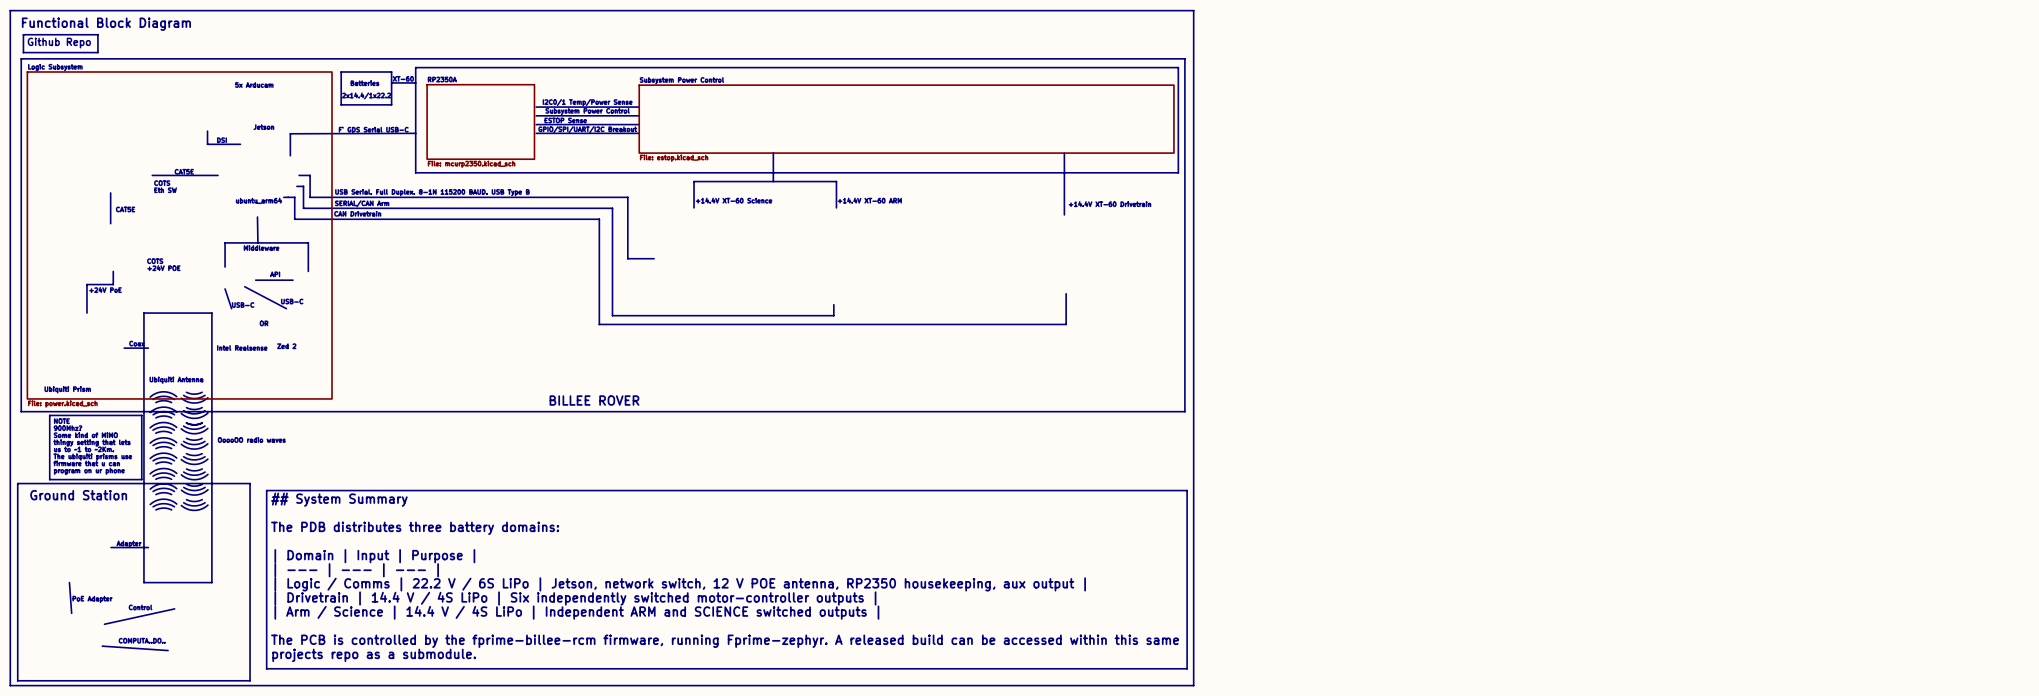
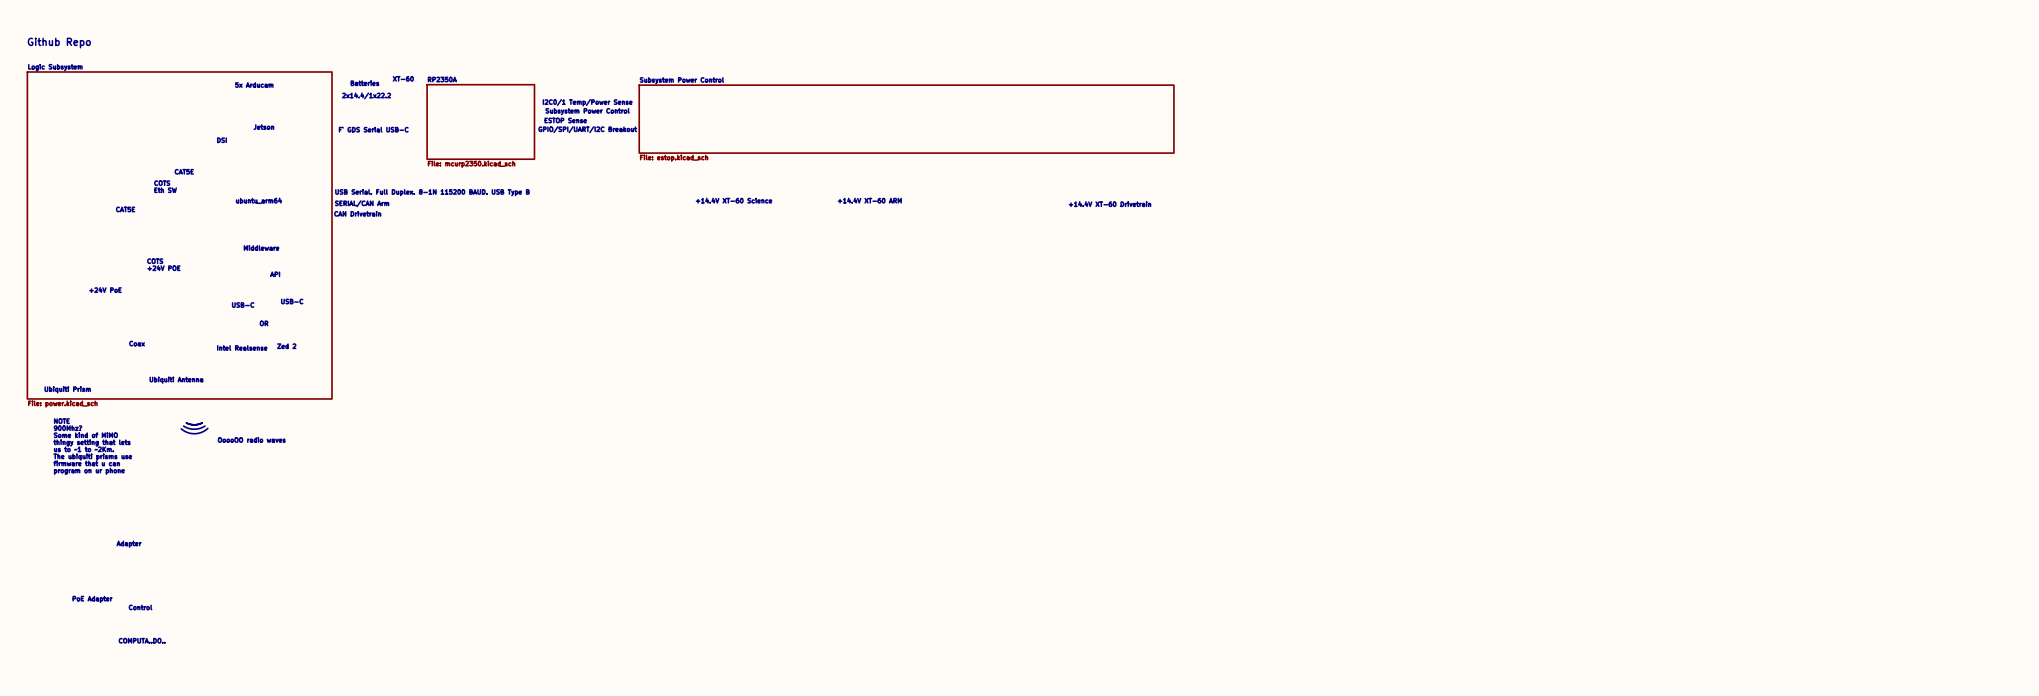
line: (10, 10) (1193, 10) (1193, 685) (10, 685) (10, 10) -> none
text: Functional Block Diagram (106, 24) -> none
line: (23, 34) (97, 34) (97, 52) (23, 52) (23, 34) -> none
line: (21, 58) (1184, 58) (1184, 411) (21, 411) (21, 58) -> none
line: (415, 67) (1178, 67) (1178, 172) (415, 172) (415, 67) -> none
line: (341, 71) (391, 71) (391, 104) (341, 104) (341, 71) -> none
line: (391, 82) (415, 82) -> none
line: (536, 107) (639, 107) -> none
line: (536, 115) (639, 115) -> none
line: (536, 124) (639, 124) -> none
line: (207, 131) (207, 144) (240, 144) -> none
line: (415, 133) (290, 133) (290, 155) -> none
line: (536, 133) (639, 133) -> none
line: (773, 152) (773, 181) -> none
line: (1064, 153) (1064, 214) -> none
line: (152, 175) (218, 175) -> none
line: (299, 175) (310, 175) (310, 197) (627, 197) (627, 258) (654, 258) -> none
line: (296, 186) (303, 186) (303, 208) (612, 208) (612, 315) (833, 315) (833, 304) -> none
line: (110, 192) (110, 223) -> none
line: (283, 197) (294, 197) (294, 219) (599, 219) (599, 324) (1066, 324) (1066, 293) -> none
line: (694, 207) (694, 181) (836, 181) (836, 207) -> none
line: (257, 217) (257, 242) -> none
line: (225, 267) (225, 242) (308, 242) (308, 271) -> none
line: (113, 271) (113, 284) (86, 284) (86, 313) -> none
line: (255, 280) (292, 280) -> none
line: (244, 286) (286, 308) -> none
line: (225, 288) (231, 308) -> none
line: (143, 313) (211, 313) (211, 582) (143, 582) (143, 313) -> none
line: (124, 348) (148, 348) -> none
line: (186, 392) (194, 394) (202, 392) -> none
line: (183, 395) (194, 398) (204, 395) -> none
line: (176, 396) (163, 391) (150, 397) -> none
line: (207, 397) (194, 403) (181, 398) -> none
line: (153, 399) (163, 396) (174, 399) -> none
text: BILLEE ROVER (594, 400) -> none
line: (155, 402) (163, 400) (171, 402) -> none
line: (186, 407) (194, 409) (202, 407) -> none
line: (183, 410) (194, 413) (204, 410) -> none
line: (176, 411) (163, 407) (150, 412) -> none
line: (207, 413) (194, 418) (181, 413) -> none
line: (153, 414) (163, 411) (174, 414) -> none
line: (49, 415) (141, 415) (141, 479) (49, 479) (49, 415) -> none
line: (155, 417) (163, 416) (171, 417) -> none
line: (176, 427) (163, 422) (150, 427) -> none
line: (153, 430) (163, 427) (174, 430) -> none
line: (155, 433) (163, 431) (171, 433) -> none
line: (186, 438) (194, 440) (202, 438) -> none
line: (183, 441) (194, 444) (204, 441) -> none
line: (176, 442) (163, 437) (150, 443) -> none
line: (207, 443) (194, 449) (181, 444) -> none
line: (153, 445) (163, 442) (174, 445) -> none
line: (155, 448) (163, 446) (171, 448) -> none
line: (186, 453) (194, 455) (202, 453) -> none
line: (183, 456) (194, 459) (204, 456) -> none
line: (176, 458) (163, 453) (150, 458) -> none
line: (207, 459) (194, 464) (181, 459) -> none
line: (153, 460) (163, 457) (174, 460) -> none
line: (155, 463) (163, 462) (171, 463) -> none
line: (186, 468) (194, 470) (202, 468) -> none
line: (183, 472) (194, 475) (205, 472) -> none
line: (176, 473) (163, 468) (150, 473) -> none
line: (207, 474) (194, 479) (181, 474) -> none
line: (153, 476) (163, 473) (174, 476) -> none
line: (155, 479) (163, 477) (171, 479) -> none
line: (17, 483) (250, 483) (250, 680) (17, 680) (17, 483) -> none
line: (186, 484) (194, 486) (202, 484) -> none
line: (183, 487) (194, 490) (205, 487) -> none
line: (176, 488) (163, 483) (150, 489) -> none
line: (207, 489) (194, 495) (181, 490) -> none
line: (266, 490) (1187, 490) (1187, 668) (266, 668) (266, 490) -> none
line: (153, 491) (163, 488) (174, 491) -> none
line: (155, 494) (163, 492) (171, 494) -> none
text: Ground Station (78, 495) -> none
line: (186, 499) (194, 501) (202, 499) -> none
text: ## System Summary (339, 499) -> none
line: (183, 502) (194, 505) (205, 502) -> none
line: (176, 504) (163, 499) (150, 504) -> none
line: (207, 505) (194, 510) (181, 505) -> none
line: (153, 506) (163, 503) (174, 506) -> none
line: (155, 509) (163, 508) (171, 509) -> none
text: The PDB distributes three battery domains: (415, 528) -> none
line: (111, 547) (148, 547) -> none
text: | Domain | Input | Purpose | (374, 556) -> none
text: | --- | --- | --- | (356, 570) -> none
line: (69, 582) (71, 613) -> none
text: | Logic / Comms | 22.2 V / 6S LiPo | Jetson, network switch, 12 V POE antenna, RP2350 housekeeping, aux output | (680, 584) -> none
text: | Drivetrain | 14.4 V / 4S LiPo | Six independently switched motor-controller outputs | (575, 598) -> none
line: (174, 608) (104, 624) -> none
text: | Arm / Science | 14.4 V / 4S LiPo | Independent ARM and SCIENCE switched outputs | (576, 612) -> none
text: The PCB is controlled by the fprime-billee-rcm firmware, running Fprime-zephyr. A released build can be accessed within this same (725, 641) -> none
line: (102, 646) (168, 650) -> none
text: projects repo as a submodule. (374, 655) -> none

